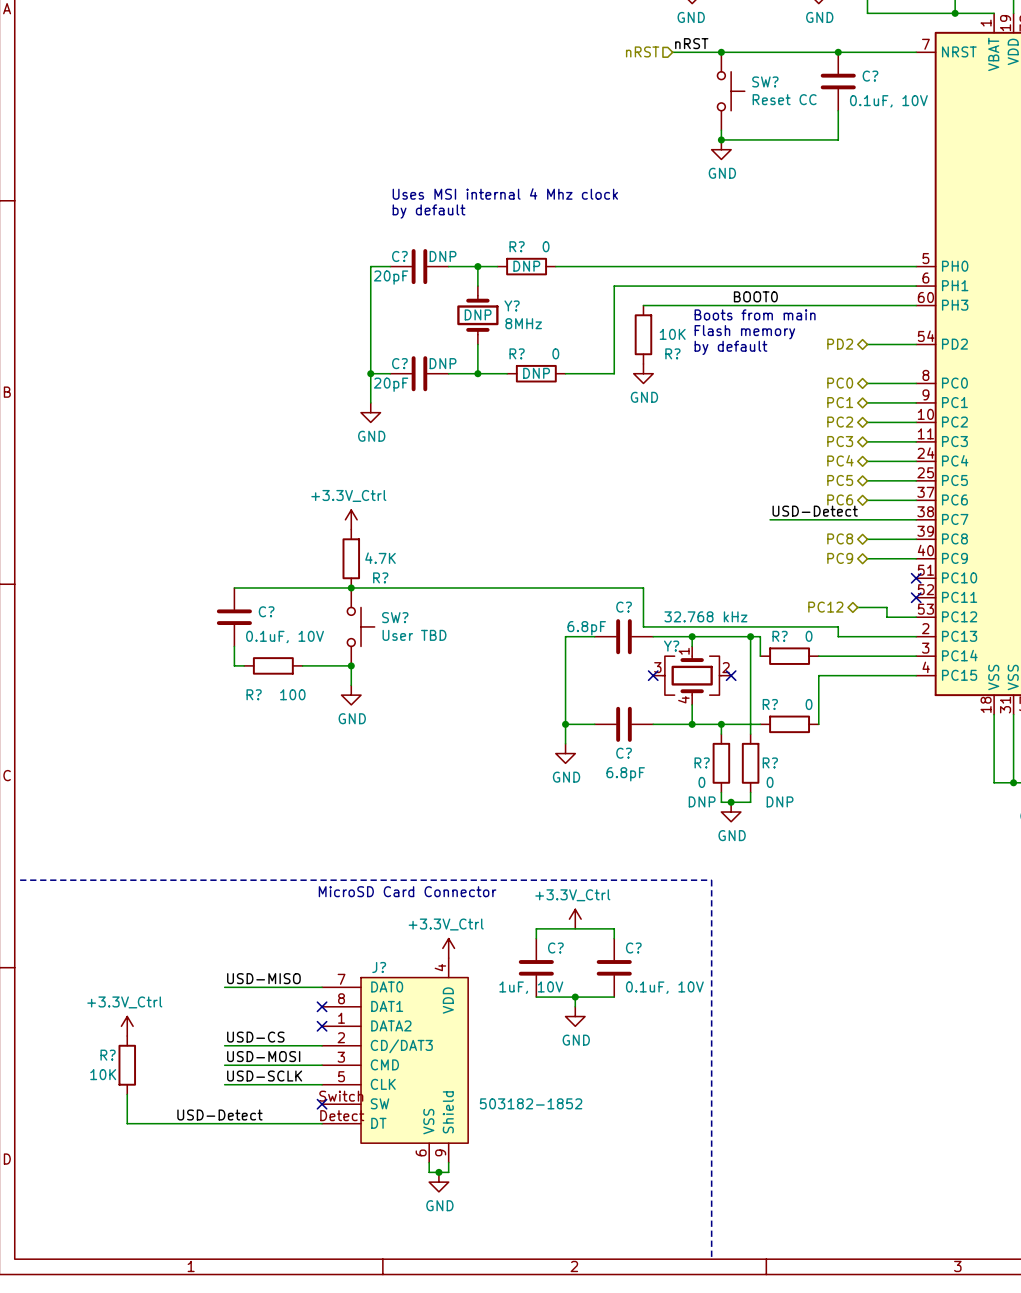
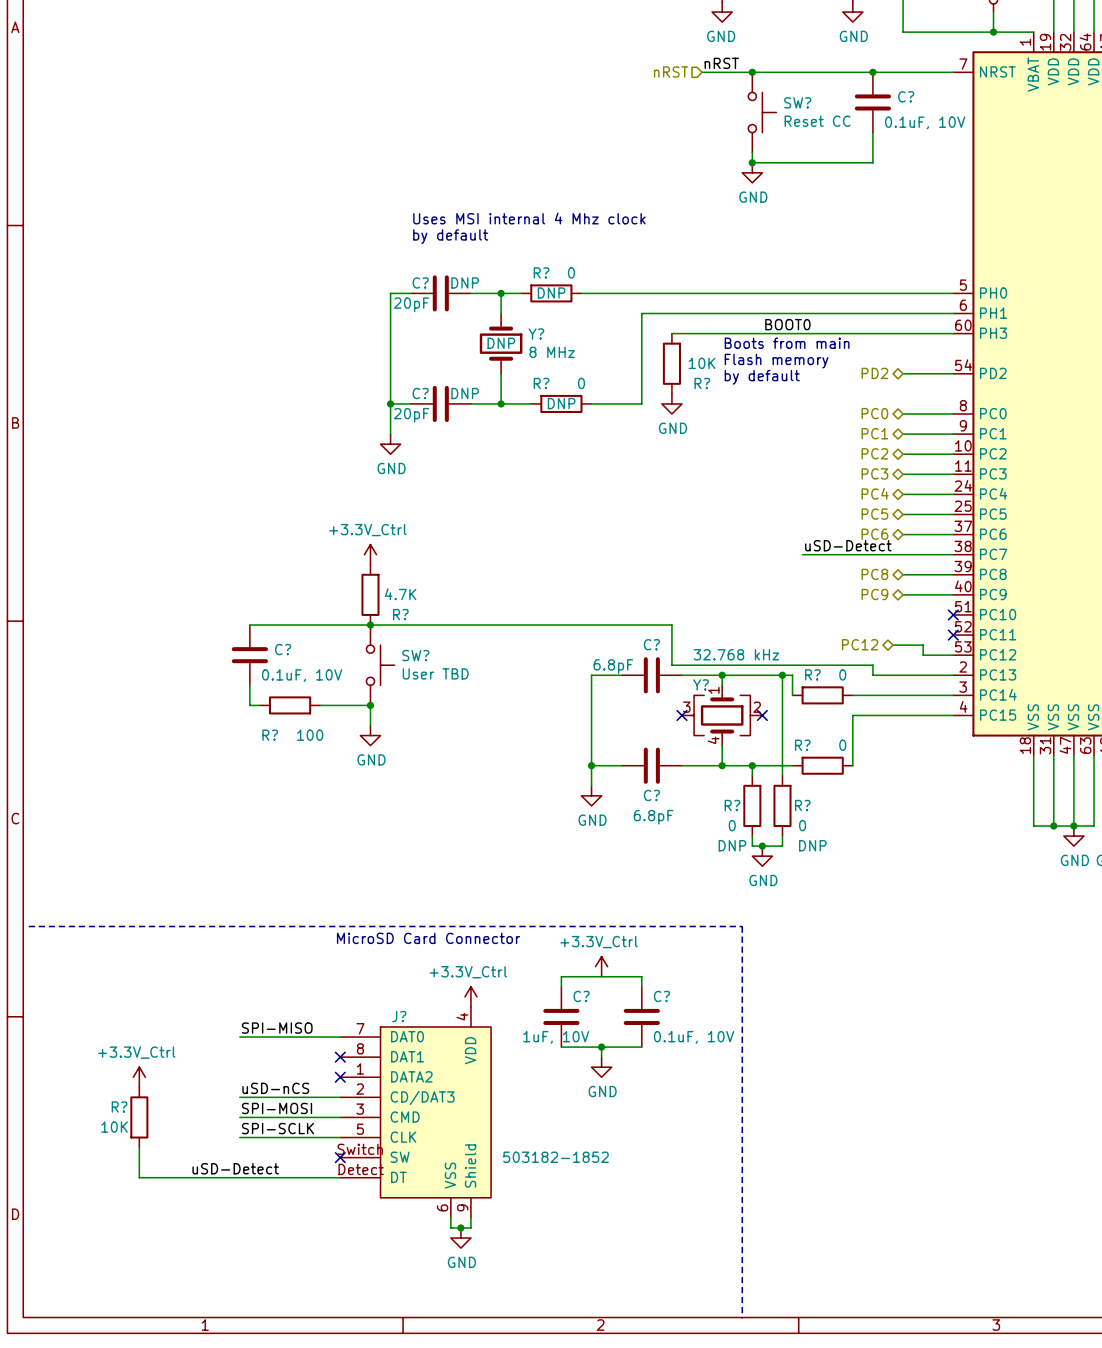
Y? value: 8MHz (523, 323) -> 8 MHz (552, 352)
label: USD-Detect (815, 511) -> uSD-Detect (848, 545)
label: USD-MISO (263, 978) -> SPI-MISO (277, 1028)
label: USD-CS (255, 1037) -> uSD-nCS (275, 1088)
label: USD-MOSI (263, 1056) -> SPI-MOSI (276, 1108)
label: USD-SCLK (264, 1076) -> SPI-SCLK (277, 1128)
label: USD-Detect (219, 1114) -> uSD-Detect (235, 1168)

